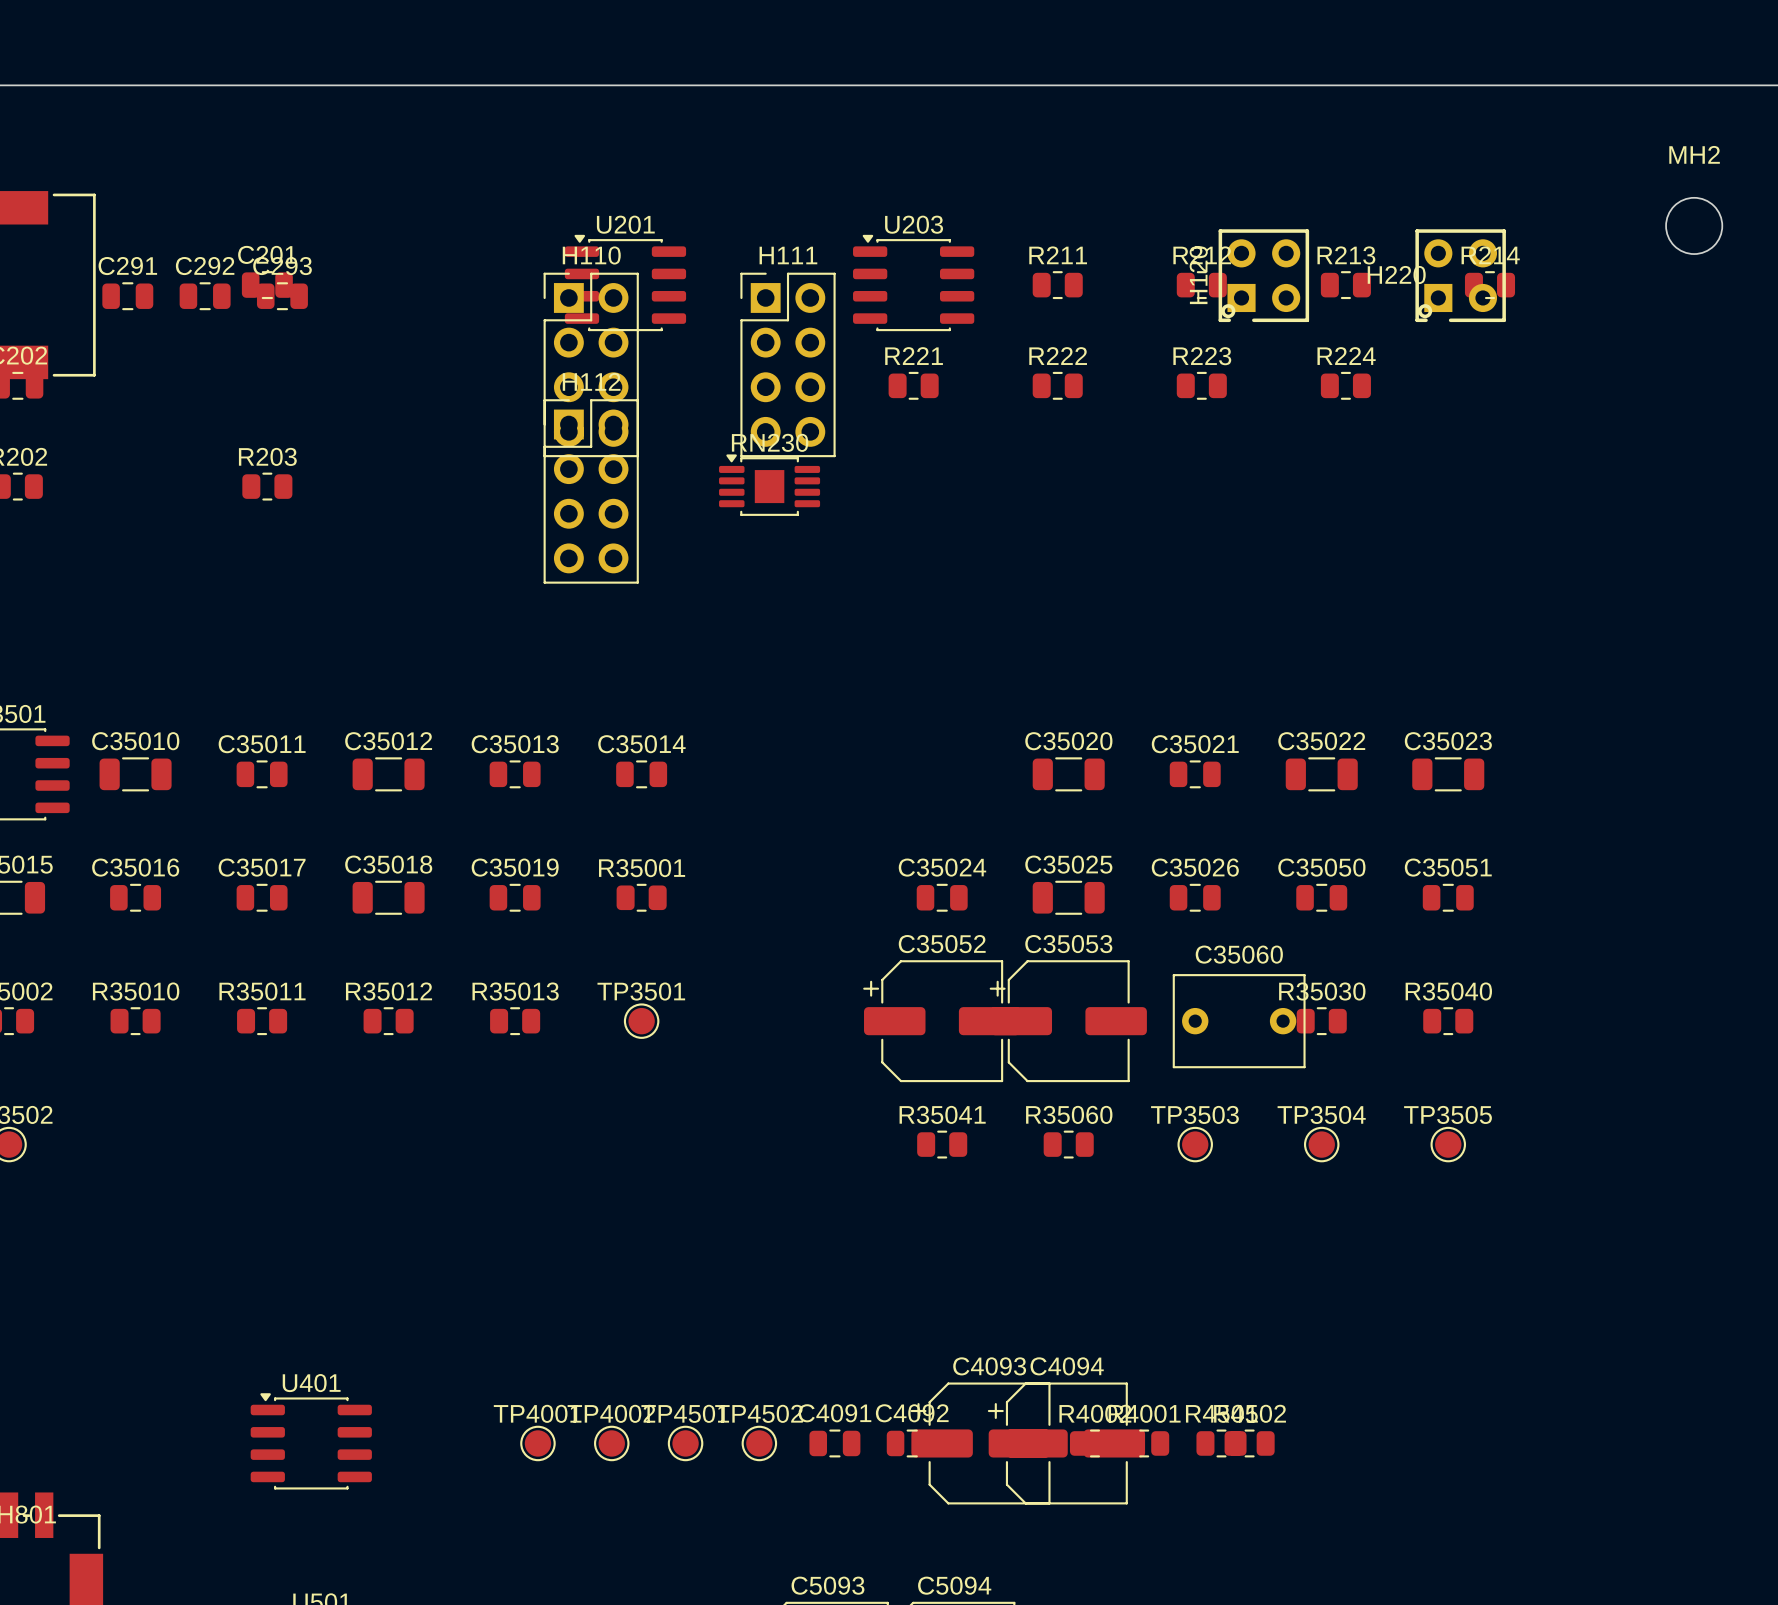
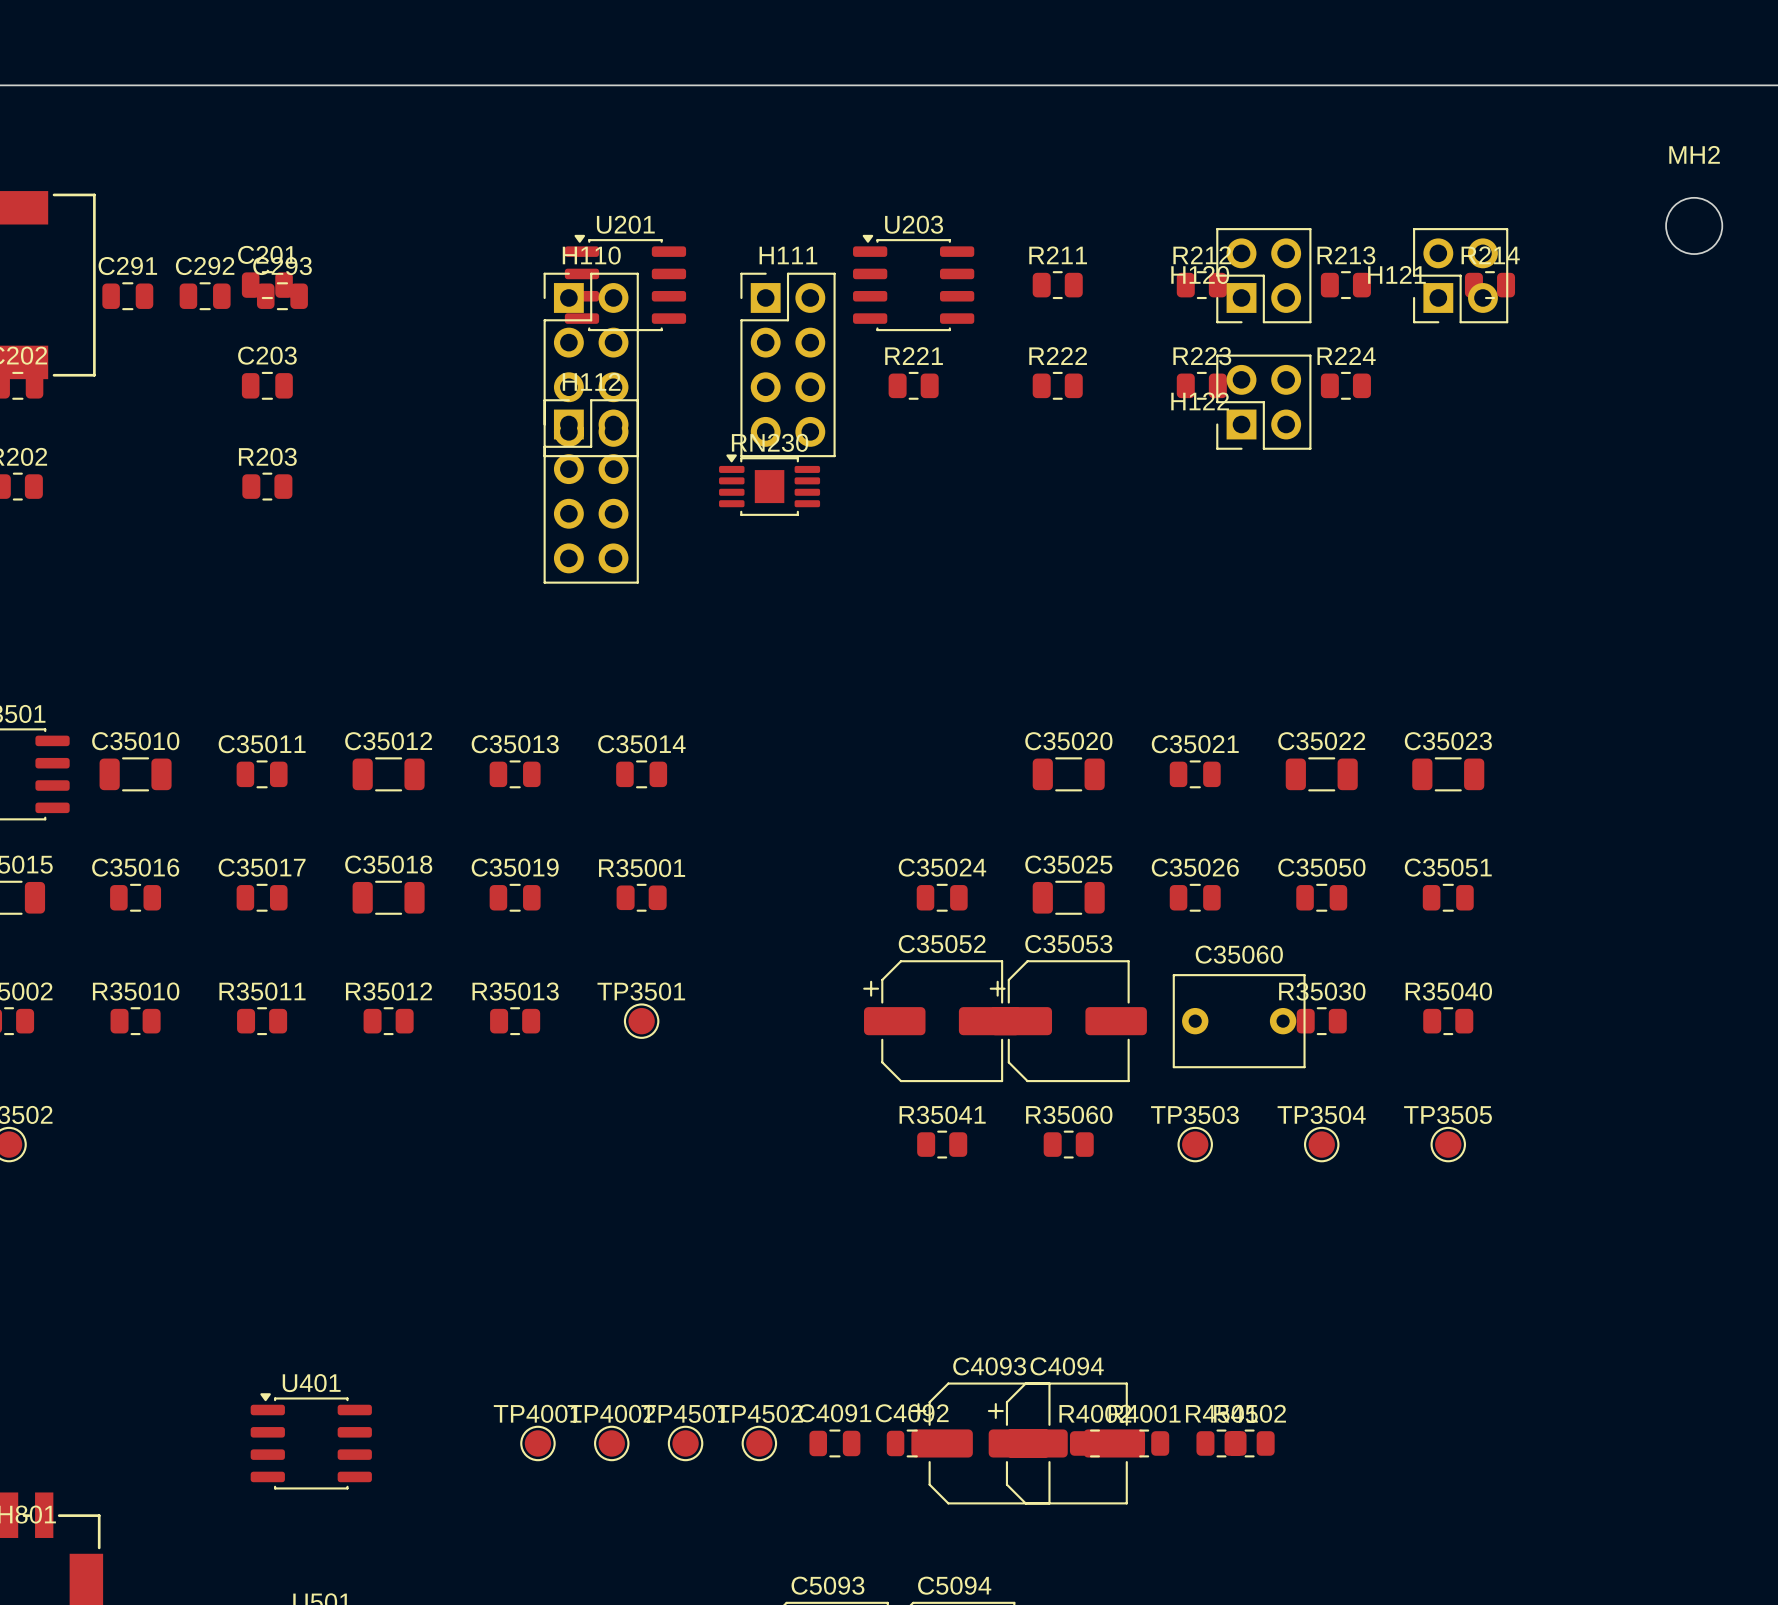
H120 footprint: [1218, 229, 1310, 323] -> [1216, 228, 1312, 324]
H220: (1460, 275) -> none
H121: none -> (1460, 275)
C203: none -> (267, 385)
H122: none -> (1263, 402)

